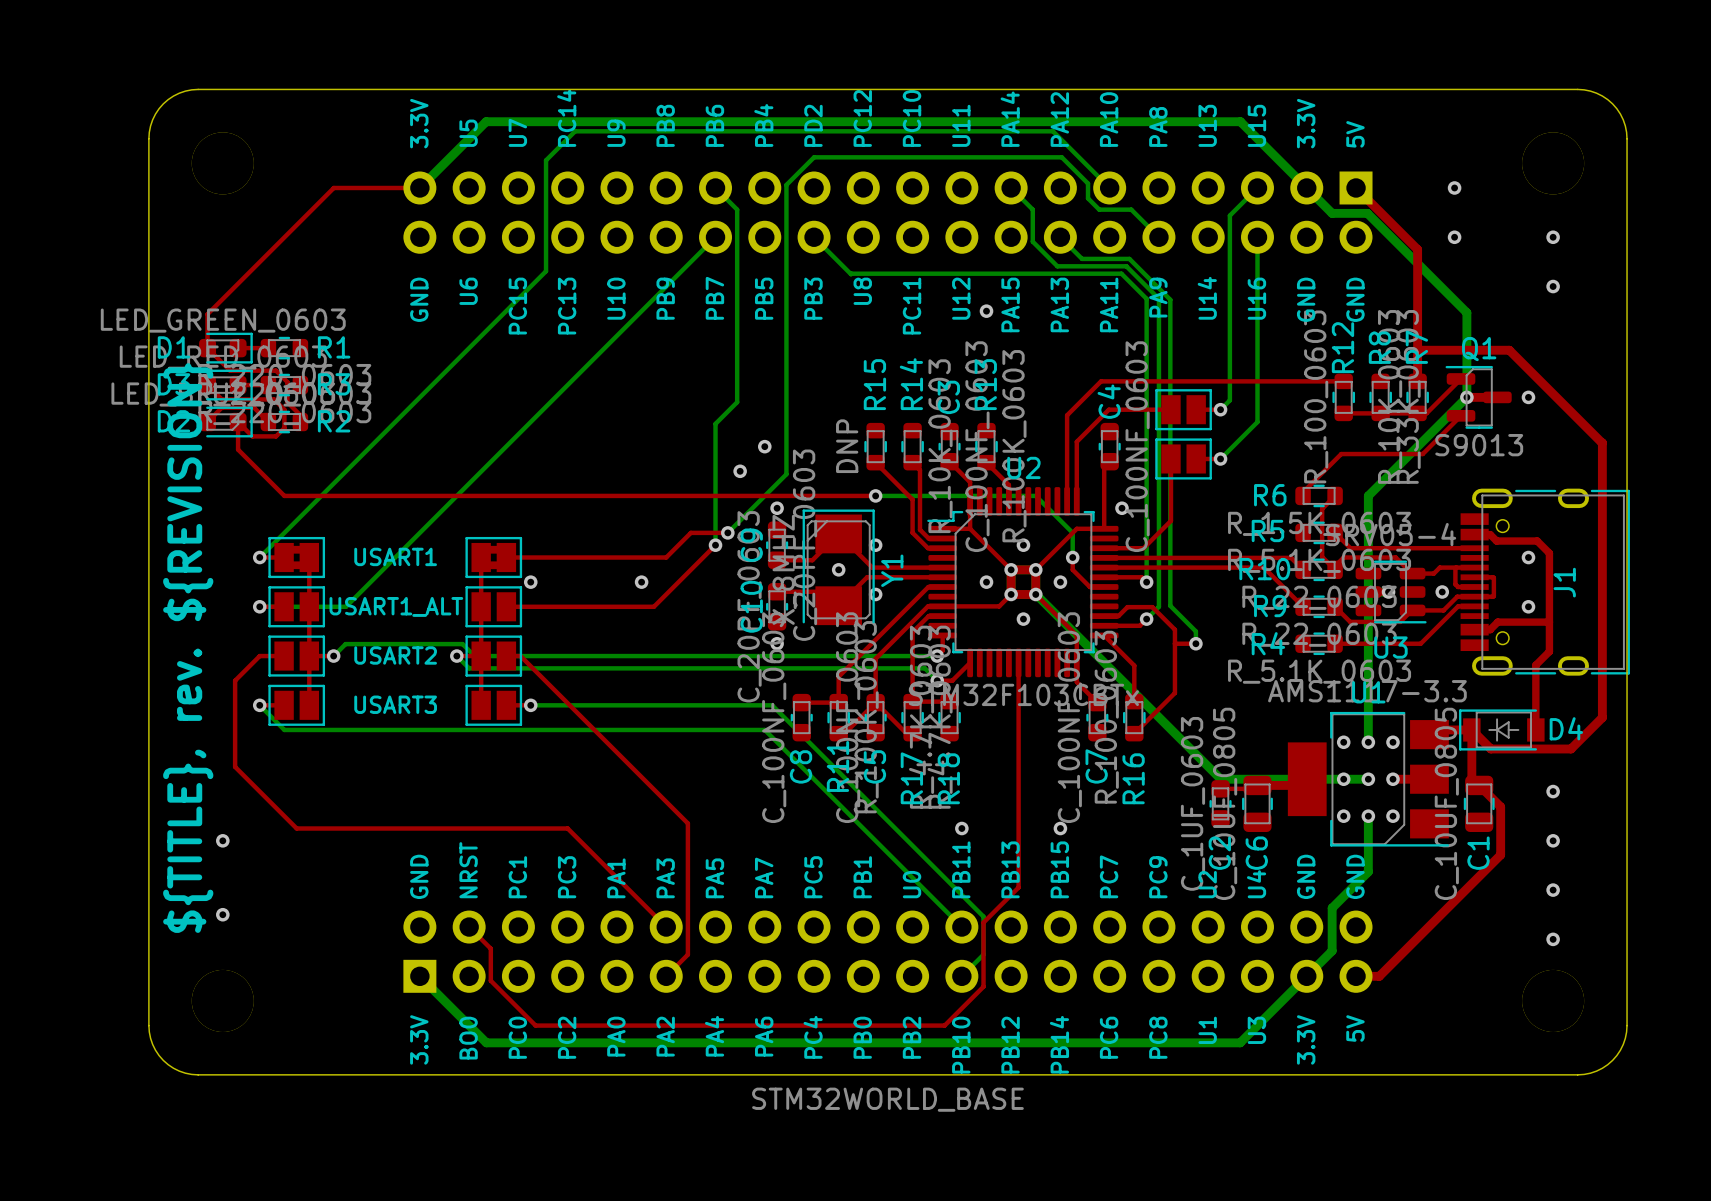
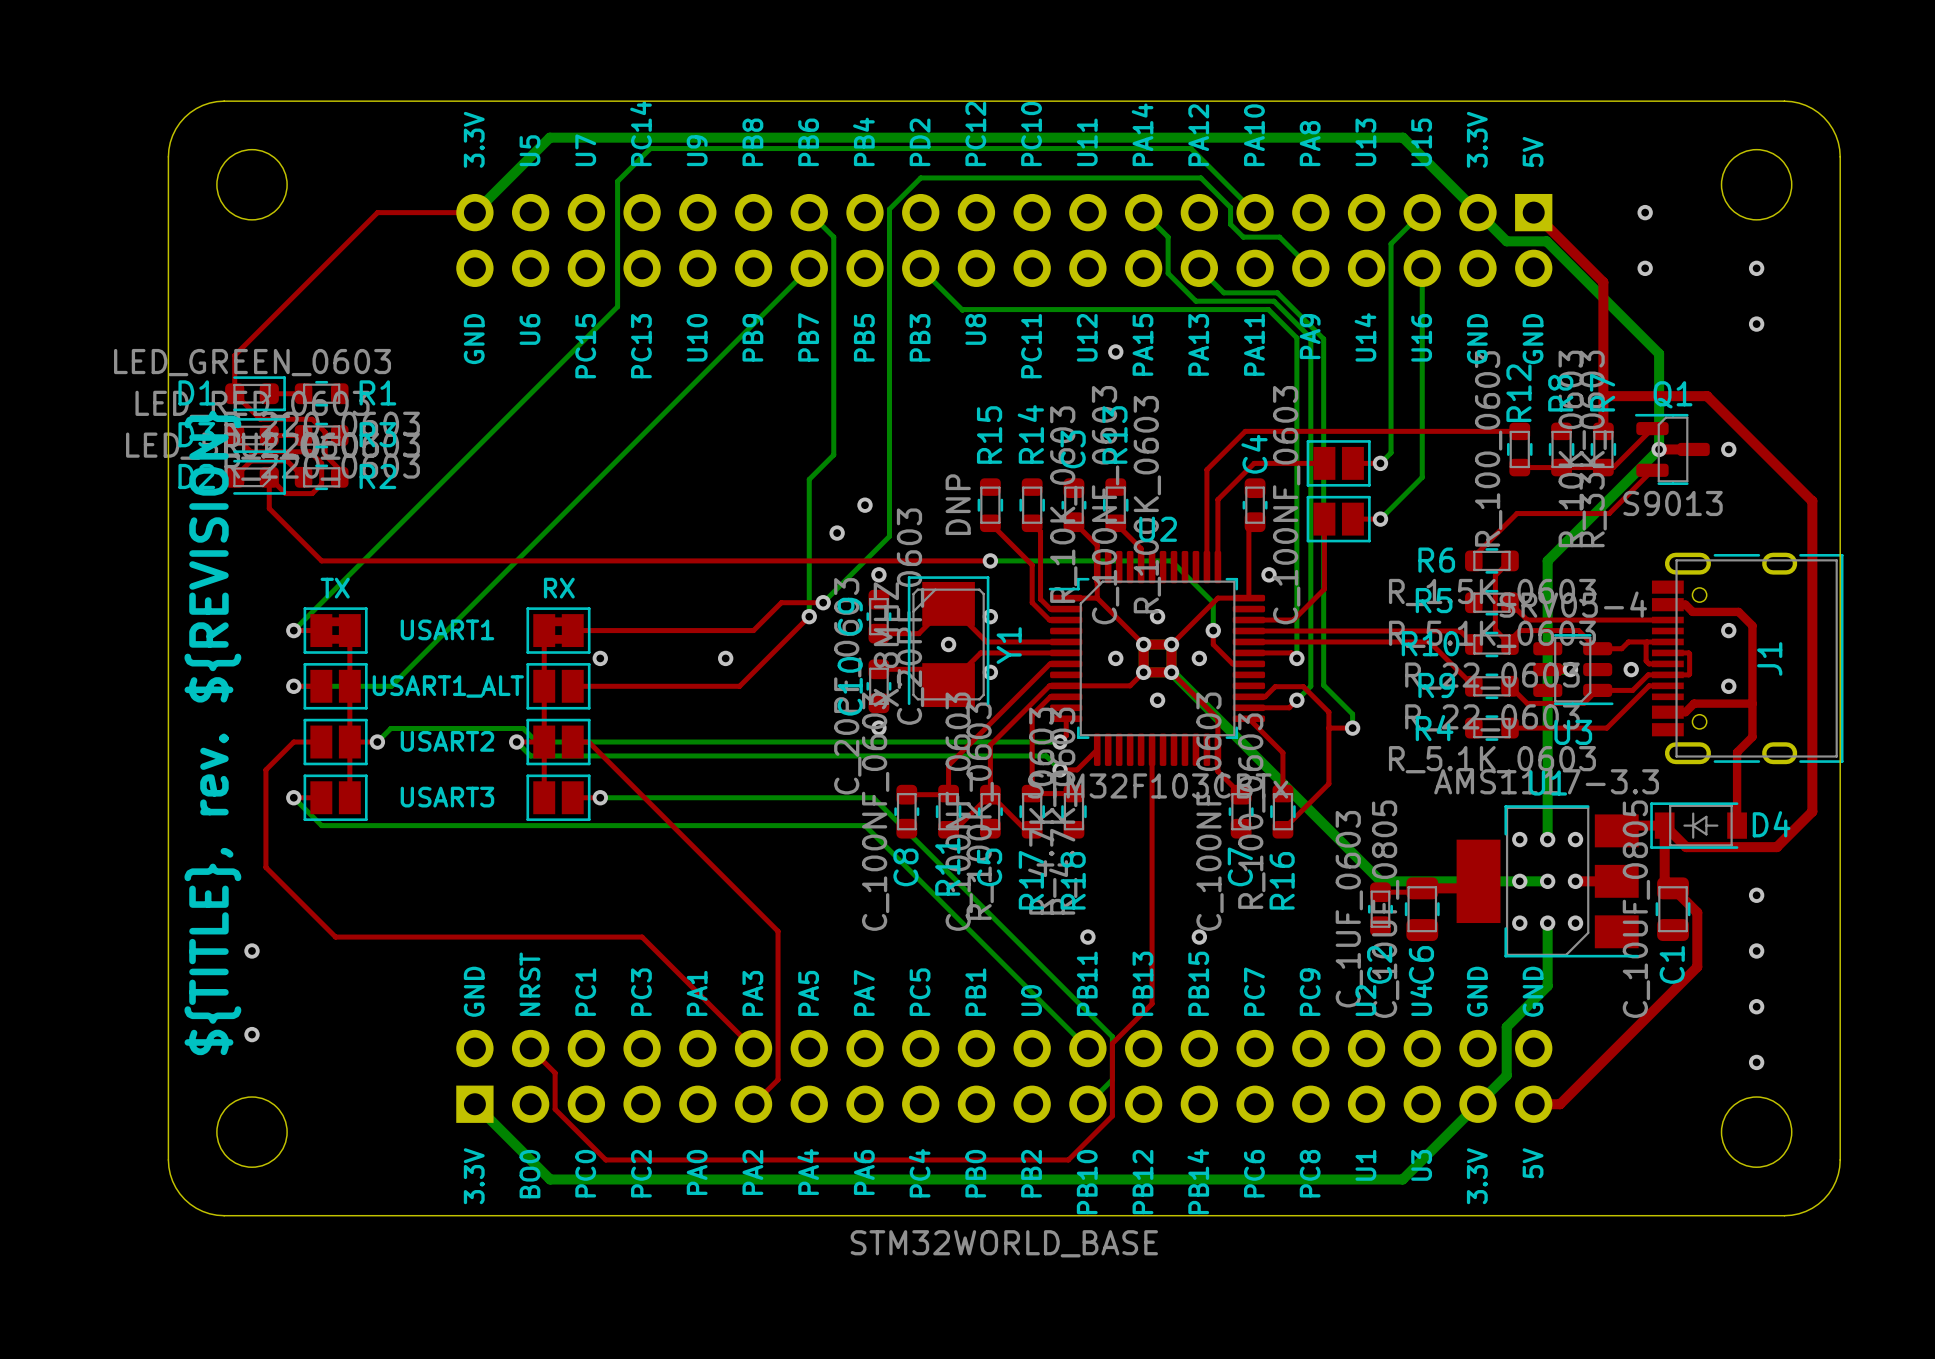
part footprint: [191, 132, 1585, 1032] -> [216, 149, 1792, 1168]
text: none -> TX (335, 588)
text: none -> RX (559, 588)

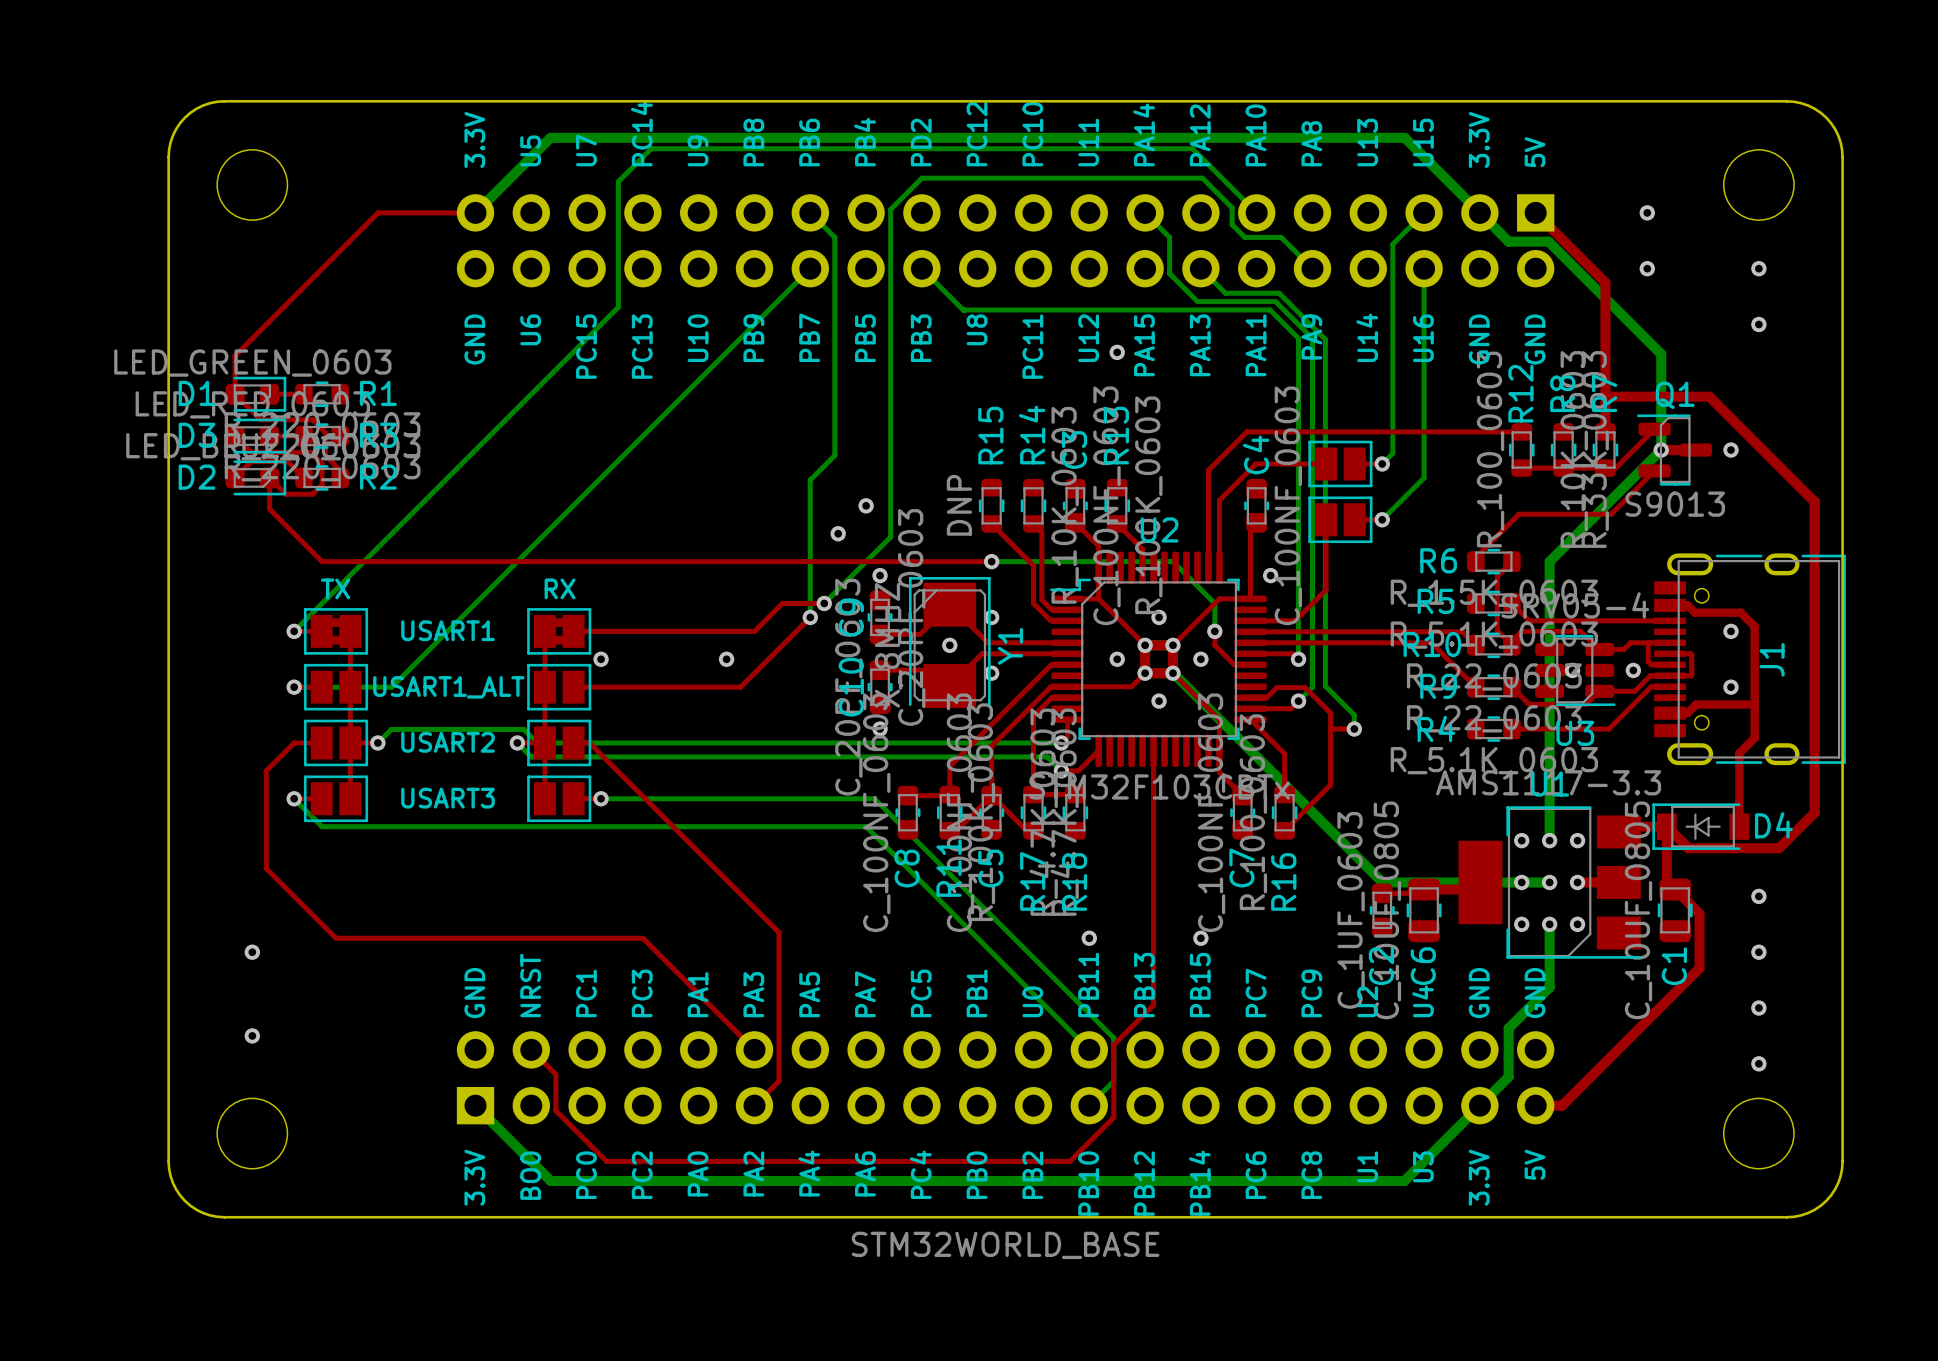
board edge: (224, 101) (1784, 101) (1805, 105) (1818, 112) (1832, 129) (1838, 142) (1840, 156) (1840, 1159) (1835, 1181) (1828, 1193) (1812, 1208) (1798, 1213) (1784, 1215) (224, 1215) (209, 1213) (190, 1204) (179, 1193) (172, 1181) (168, 1159) (168, 156) (172, 135) (184, 117) (202, 105) (224, 101) -> none
part footprint: [216, 149, 1792, 1168] -> [167, 99, 1844, 1219]
text: ${TITLE}, rev. ${REVISION} (212, 732) -> none

